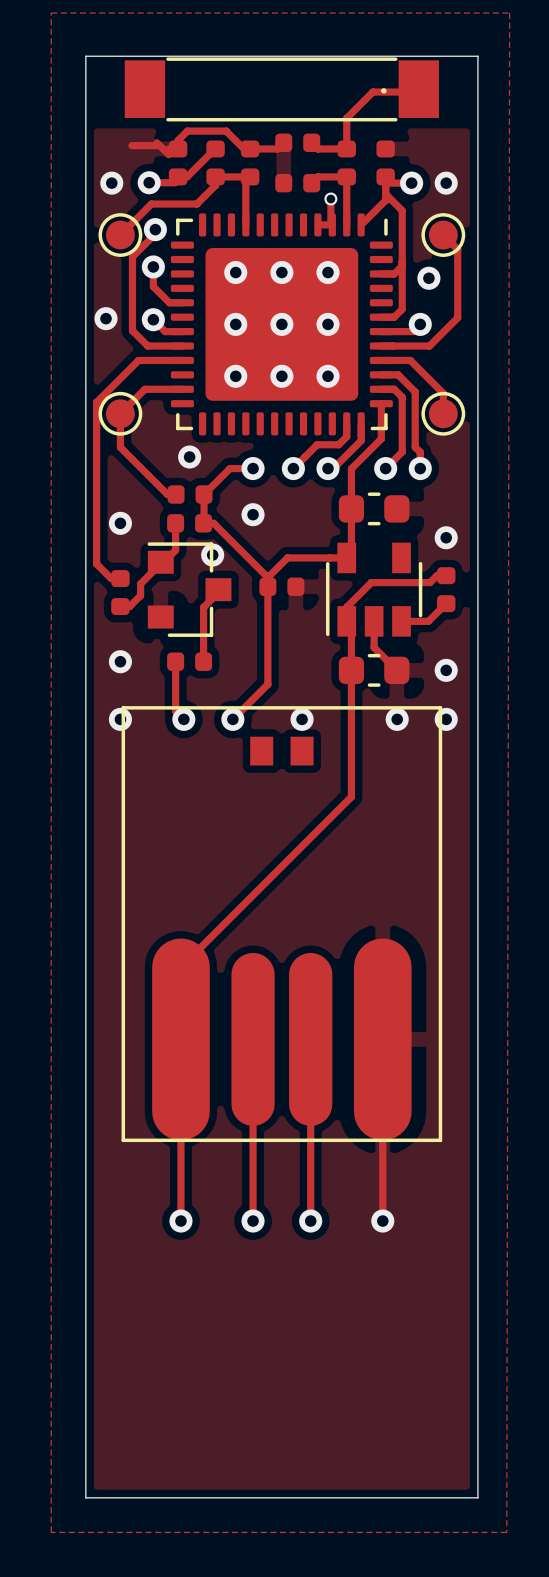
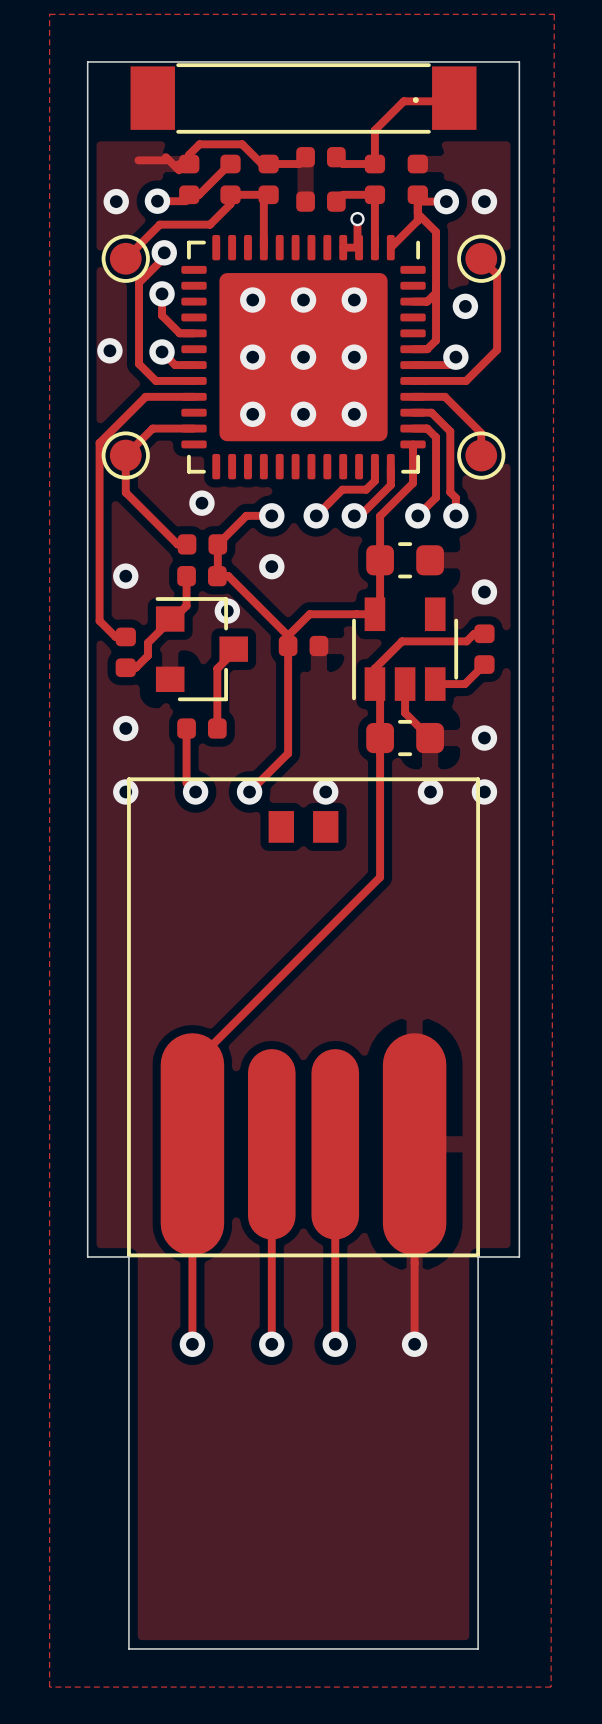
board edge: (85, 1141) (85, 1497) (123, 1497) -> (87, 1256) (128, 1256) (128, 1648)
board edge: (477, 1141) (477, 1497) (440, 1497) -> (519, 1256) (478, 1256) (478, 1648)

